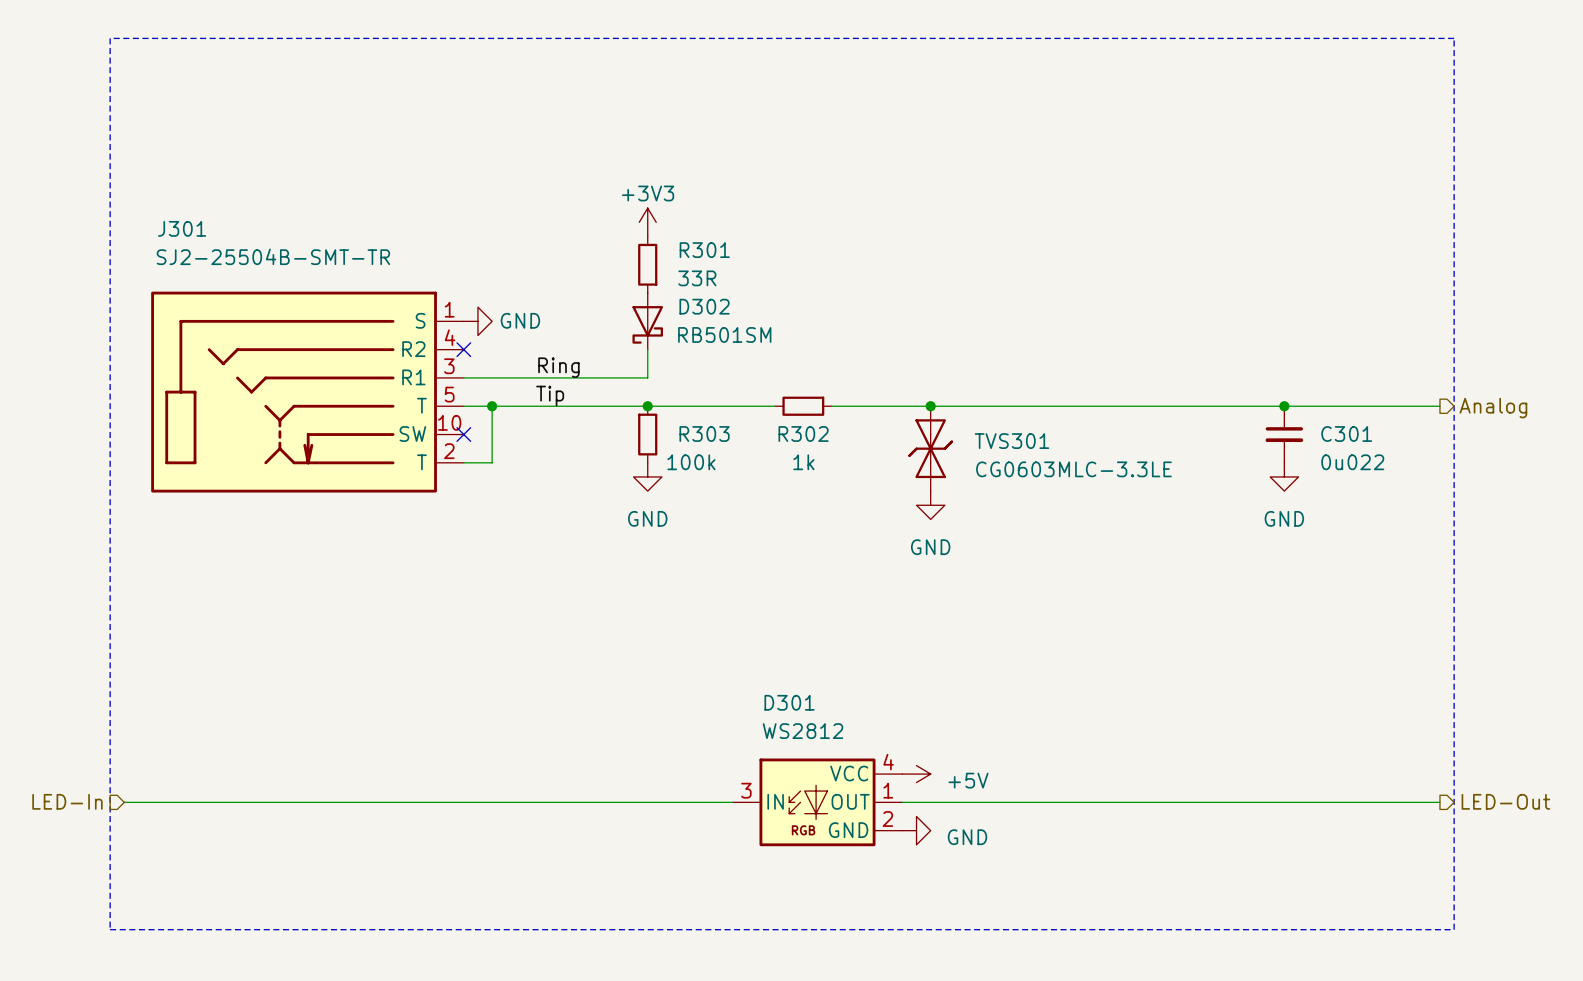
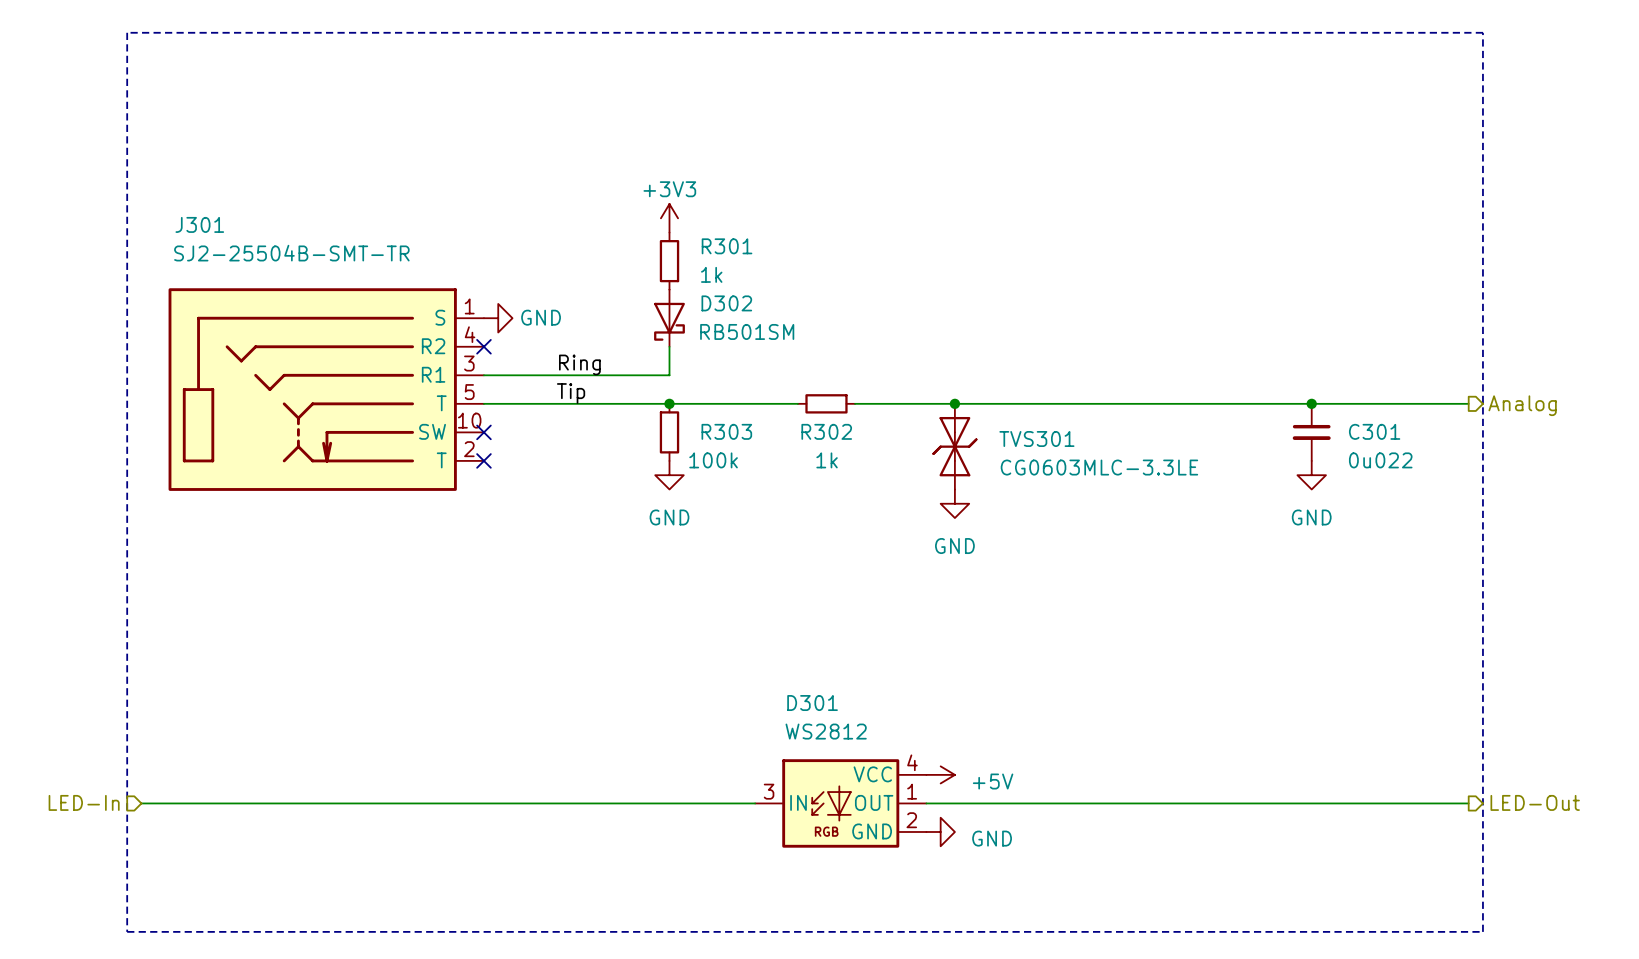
R301 value: 33R (697, 278) -> 1k (711, 274)
wire: (492, 406) (492, 462) (463, 462) -> none
junction: (492, 406) -> none
no-connect mark: none -> (483, 460)

